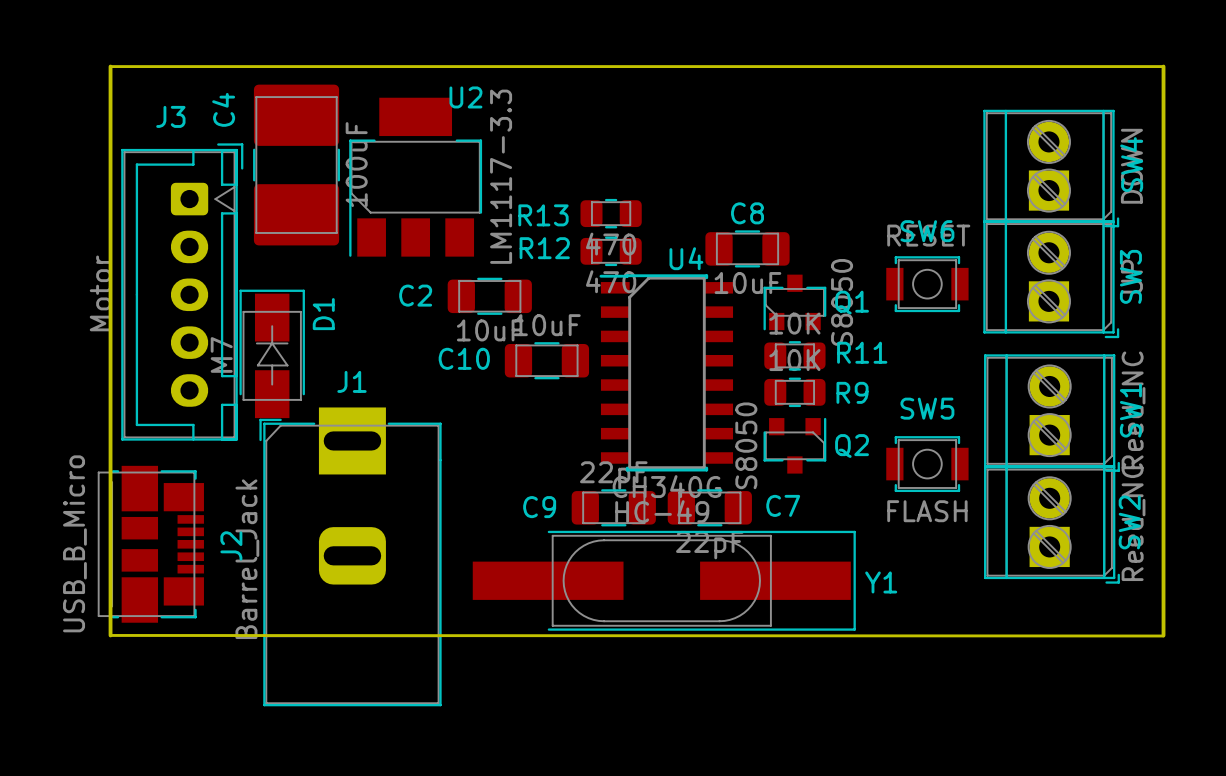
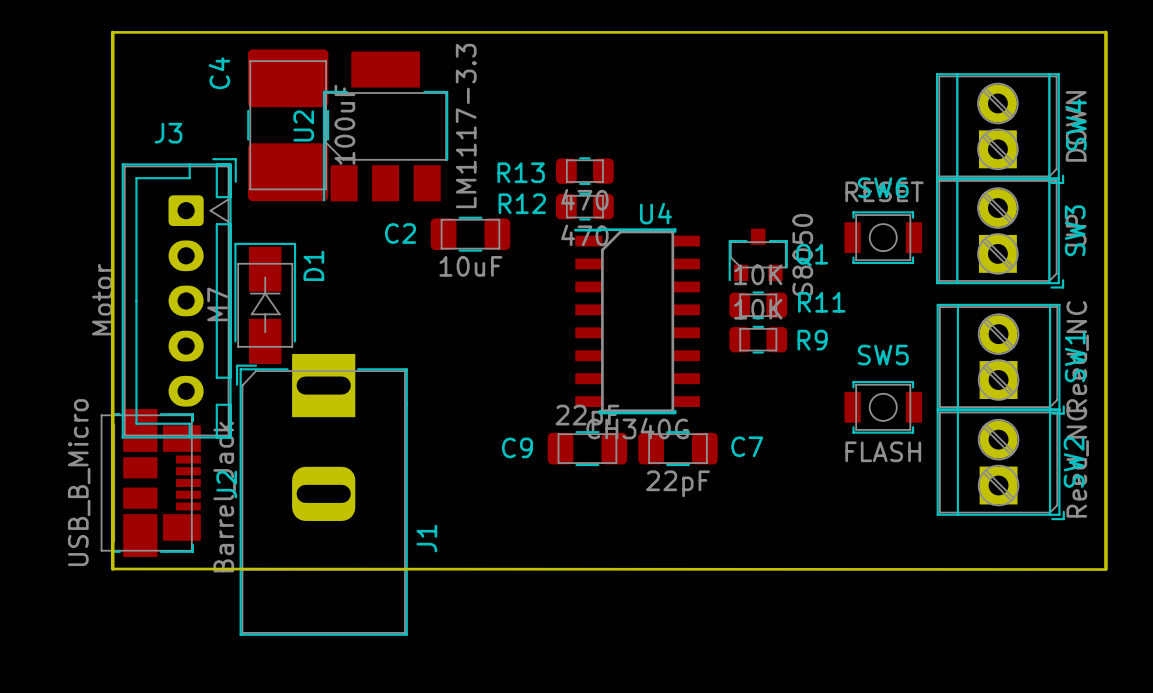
U2 name rotation: 0° (465, 97) -> 90° counterclockwise (303, 125)
U2 name position: U2 (465, 97) -> U2 (303, 125)
U2 position: (415, 177) -> (385, 126)
C8: 10uF (747, 248) -> none
J3 position: (182, 292) -> (179, 298)
C2 position: (489, 296) -> (470, 234)
C10: 10uF (546, 360) -> none
J1 name rotation: 0° (351, 381) -> 90° counterclockwise (426, 538)
J1 name position: J1 (351, 381) -> J1 (426, 538)
Q2: S8050 (794, 445) -> none
J1 position: (350, 556) -> (321, 494)
Y1: HC-49 (664, 580) -> none

